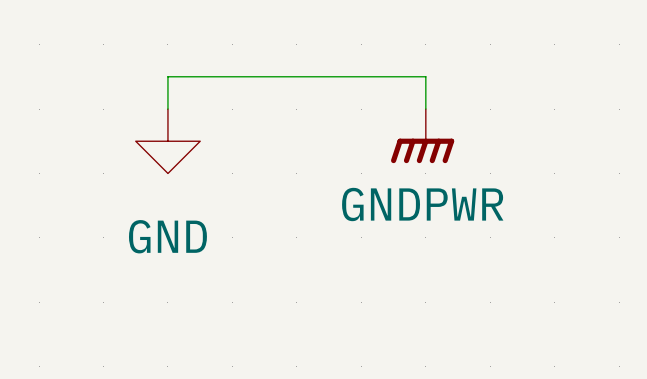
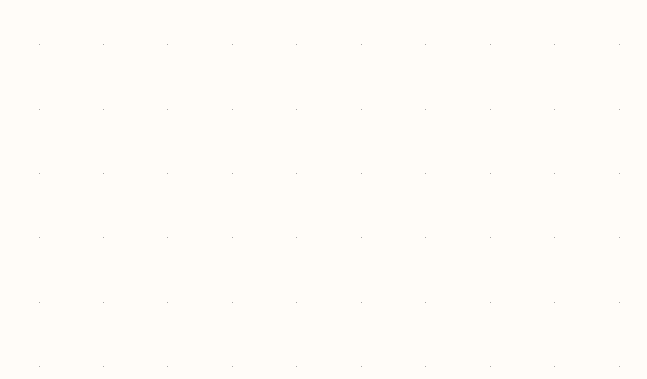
wire: (167, 109) (167, 76) (425, 76) (425, 109) -> none
power symbol: GNDPWR (422, 136) -> none
power symbol: GND (167, 141) -> none

